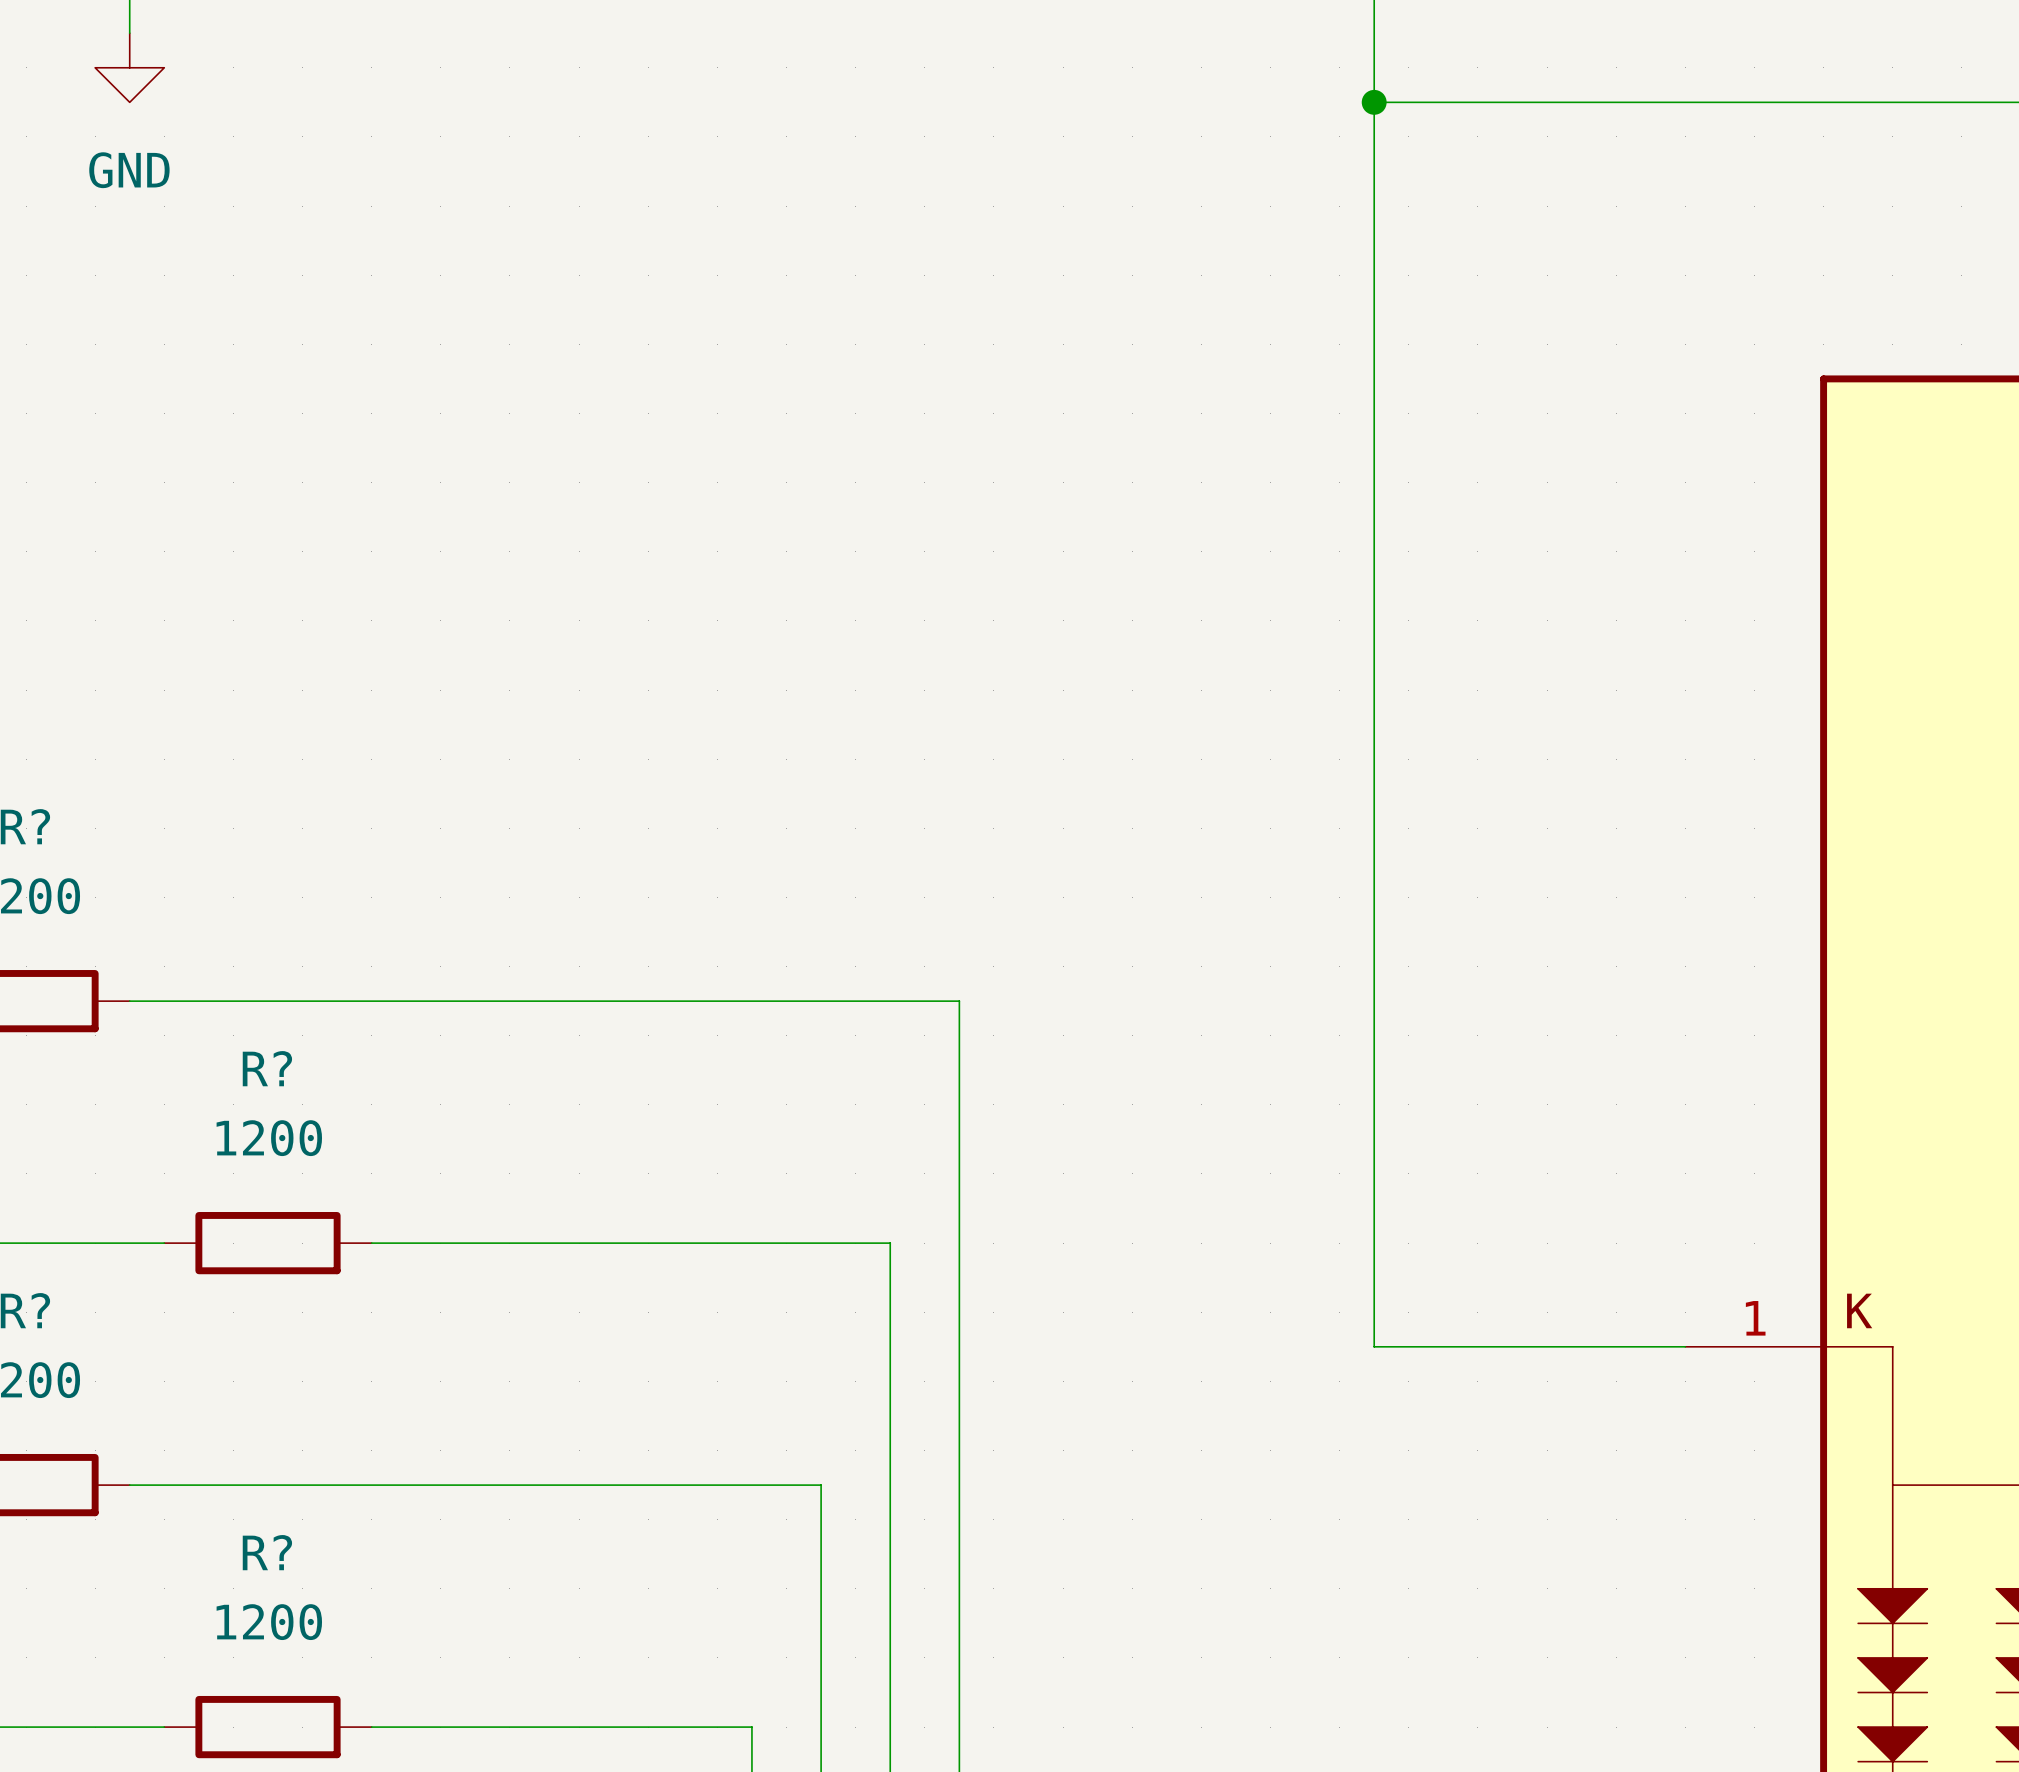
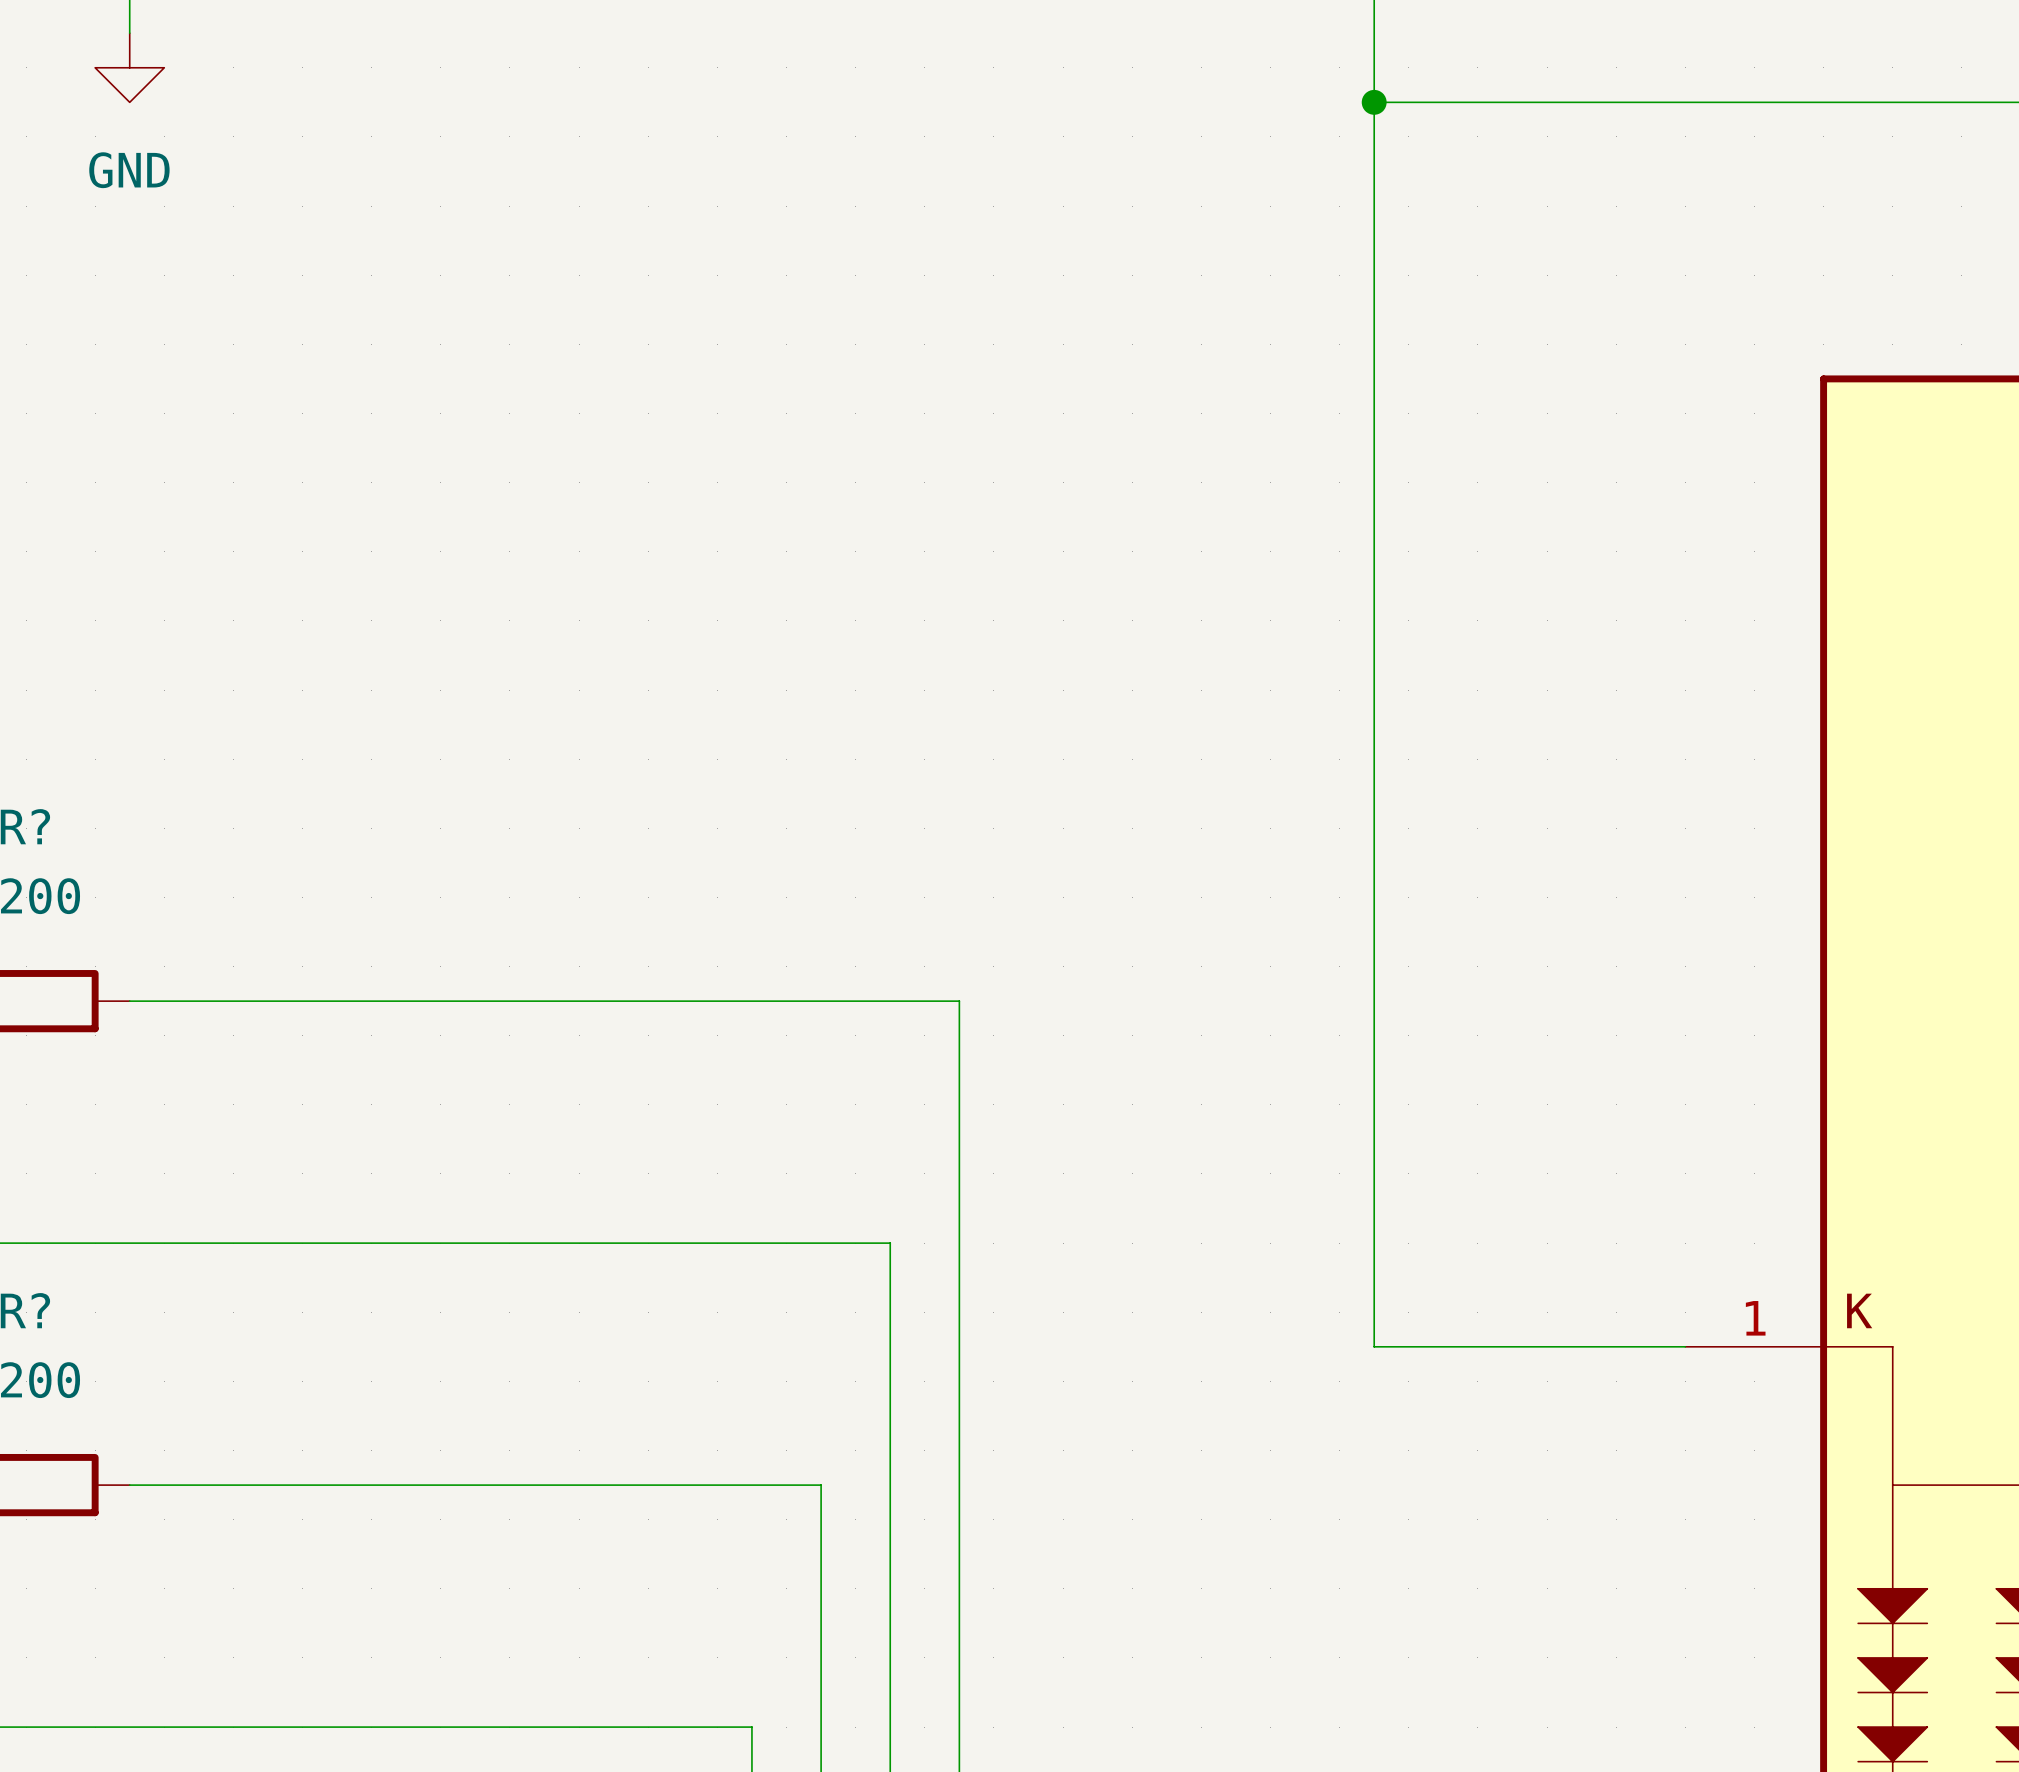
wire: none -> (164, 1243) (371, 1243)
R?: (267, 1243) -> none
wire: none -> (164, 1727) (371, 1727)
R?: (267, 1727) -> none

